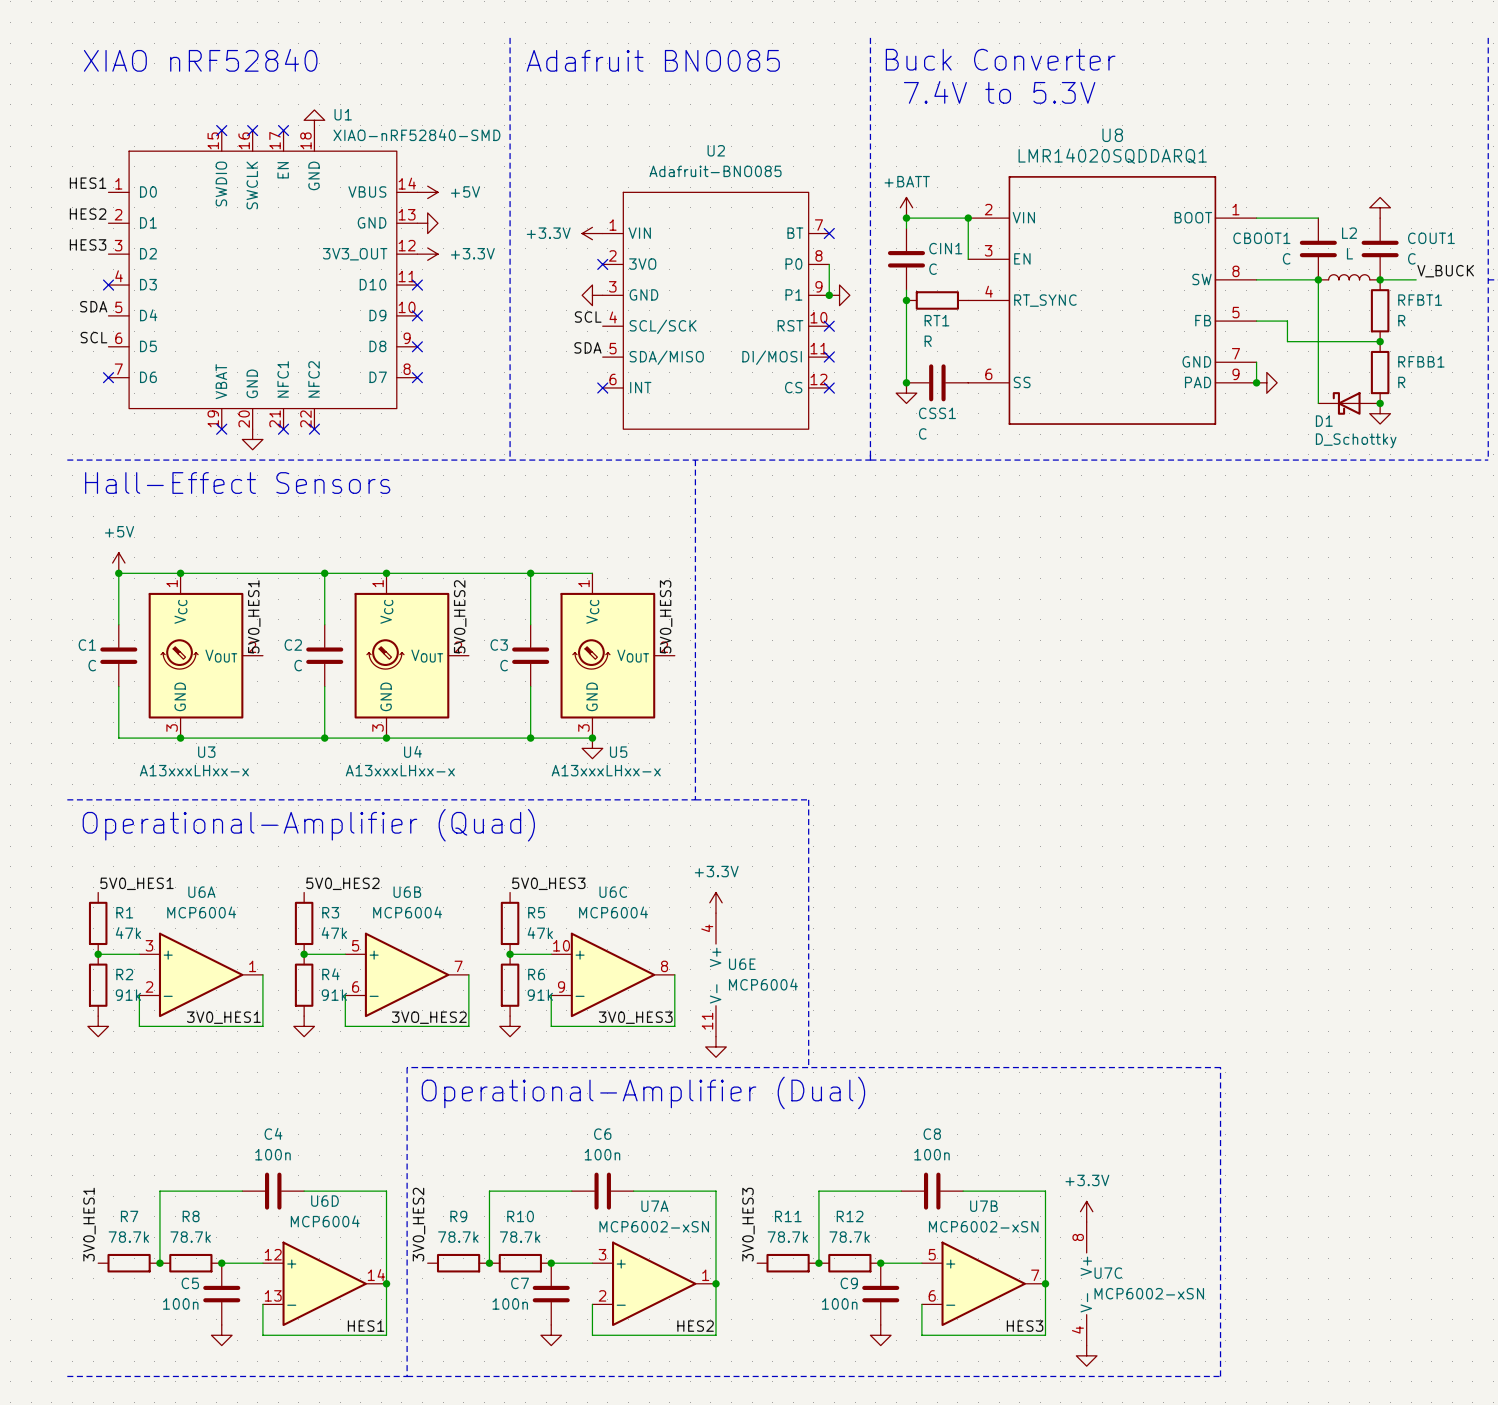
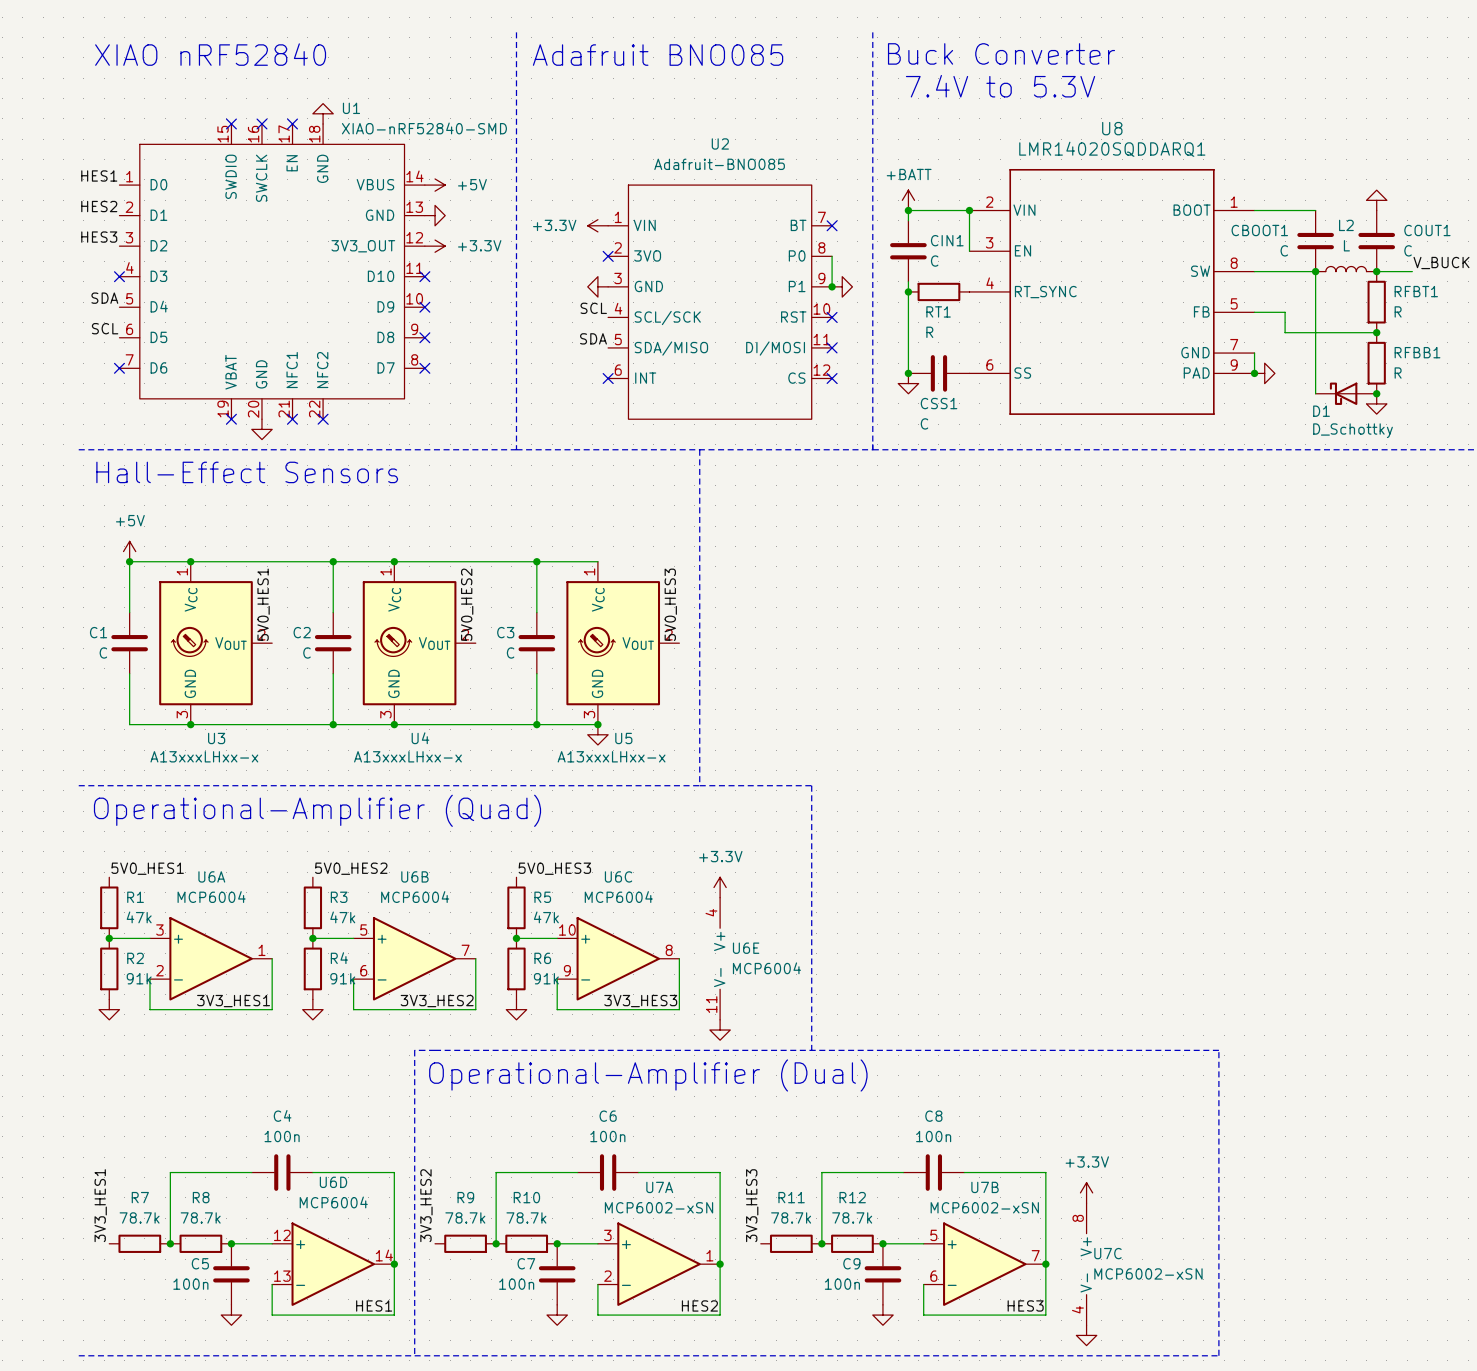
label: 3V0_HES1 (223, 1017) -> 3V3_HES1 (233, 1001)
label: 3VO_HES2 (429, 1017) -> 3V3_HES2 (437, 1001)
label: 3V0_HES3 (635, 1017) -> 3V3_HES3 (640, 1001)
label: 3V0_HES1 (89, 1224) -> 3V3_HES1 (100, 1205)
label: 3V0_HES2 (418, 1224) -> 3V3_HES2 (426, 1205)
label: 3V0_HES3 (748, 1224) -> 3V3_HES3 (752, 1205)

